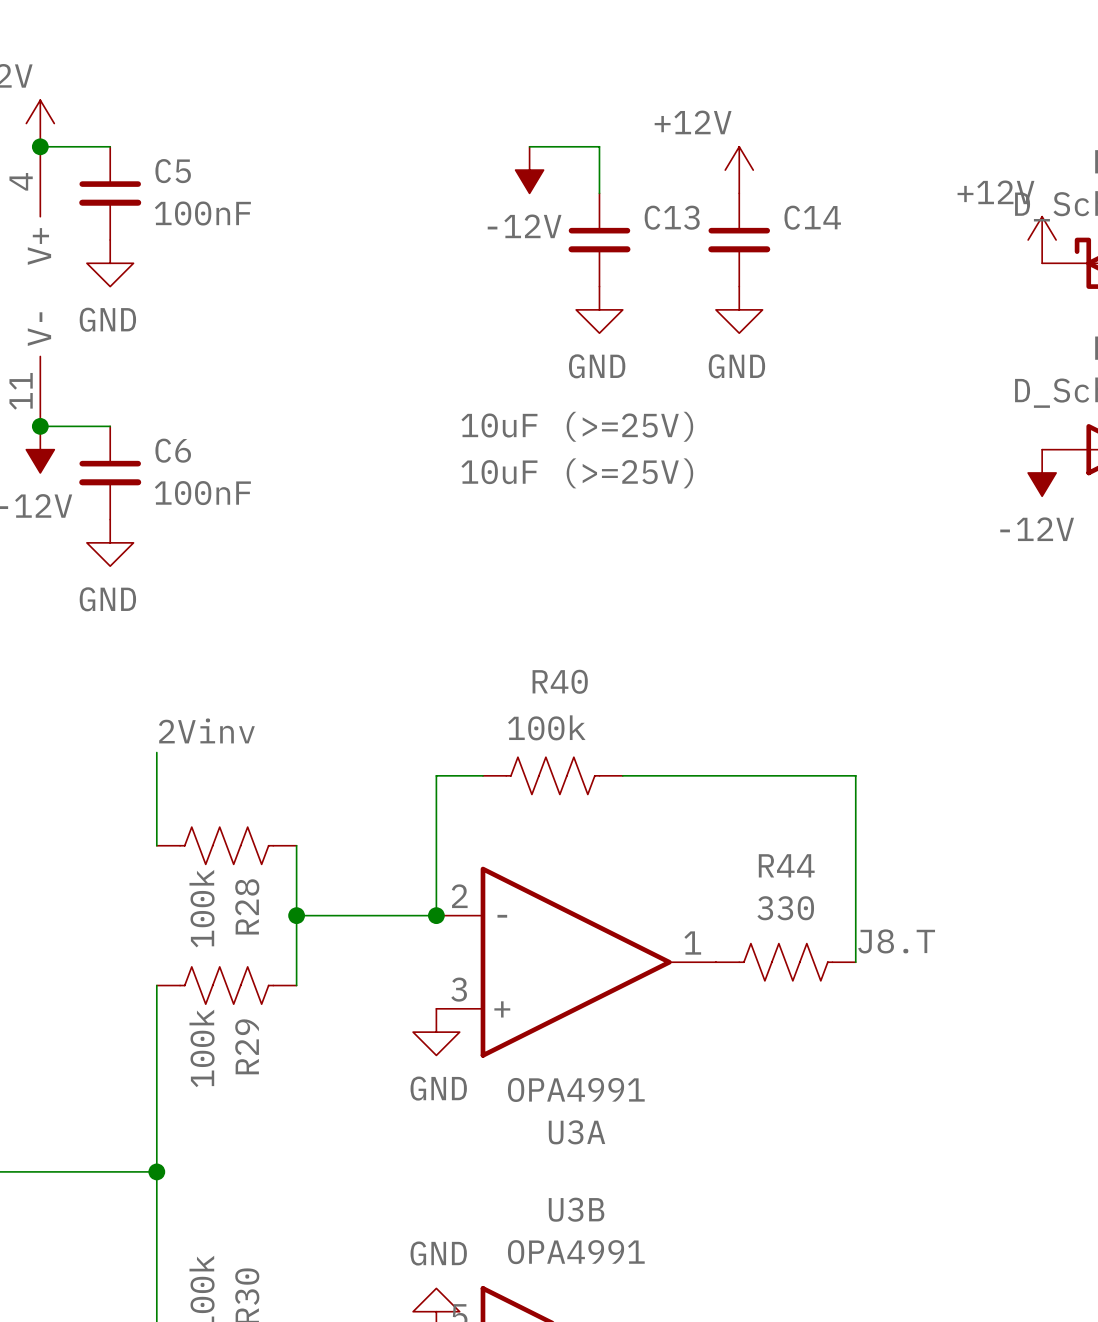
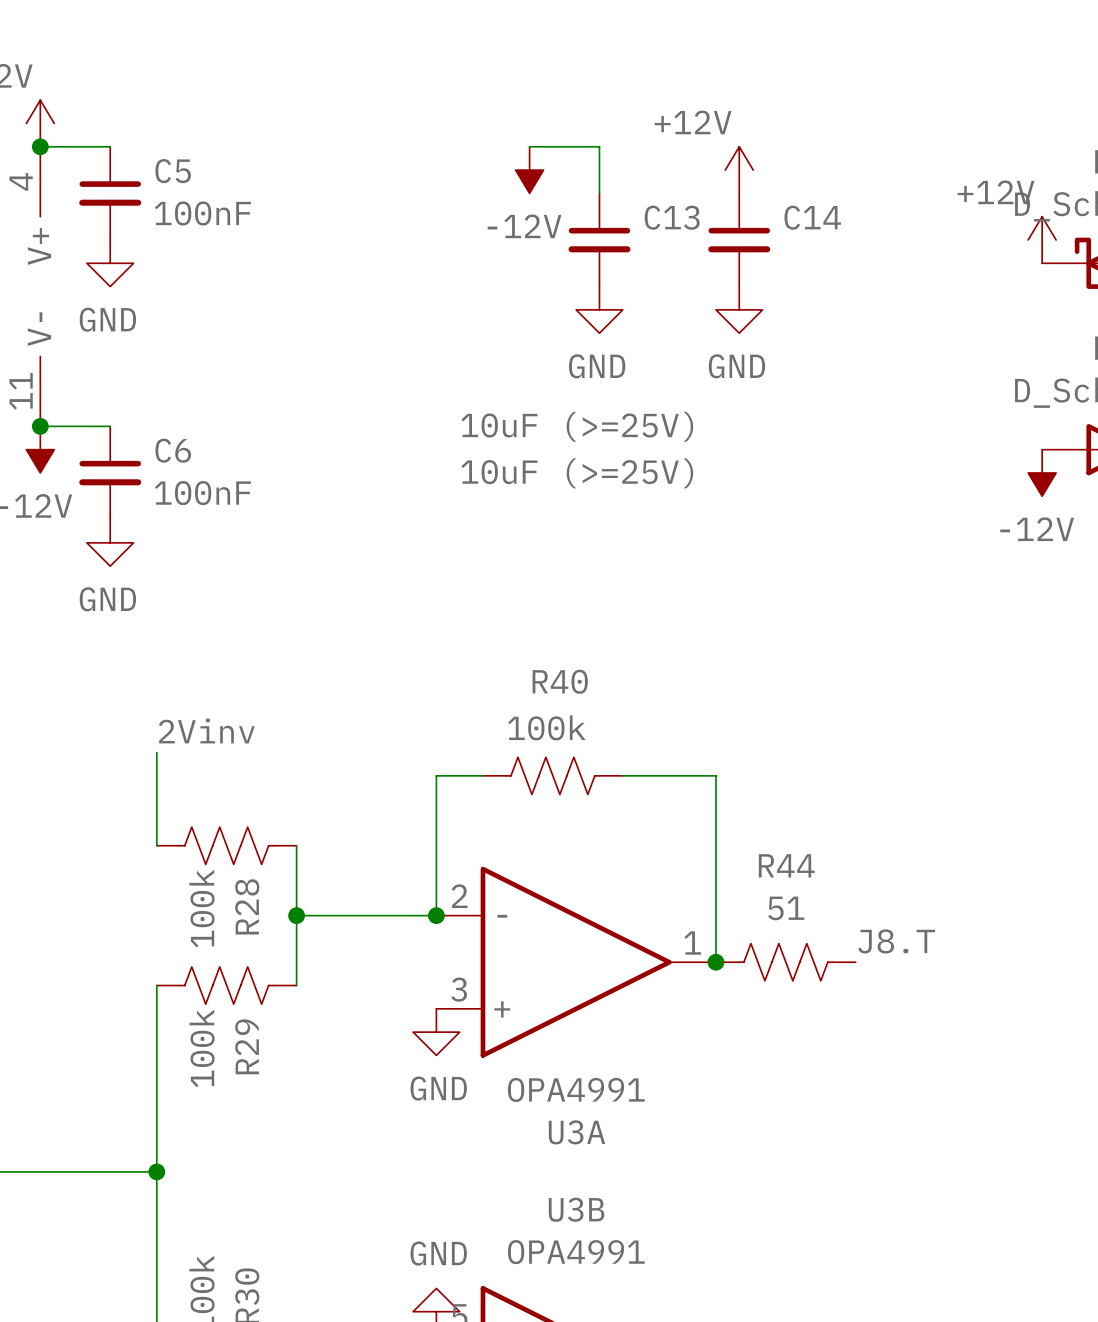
wire: (715, 775) (855, 775) (855, 962) -> (715, 775) (715, 962)
R44 value: 330 (785, 908) -> 51 (786, 908)
junction: none -> (715, 962)

